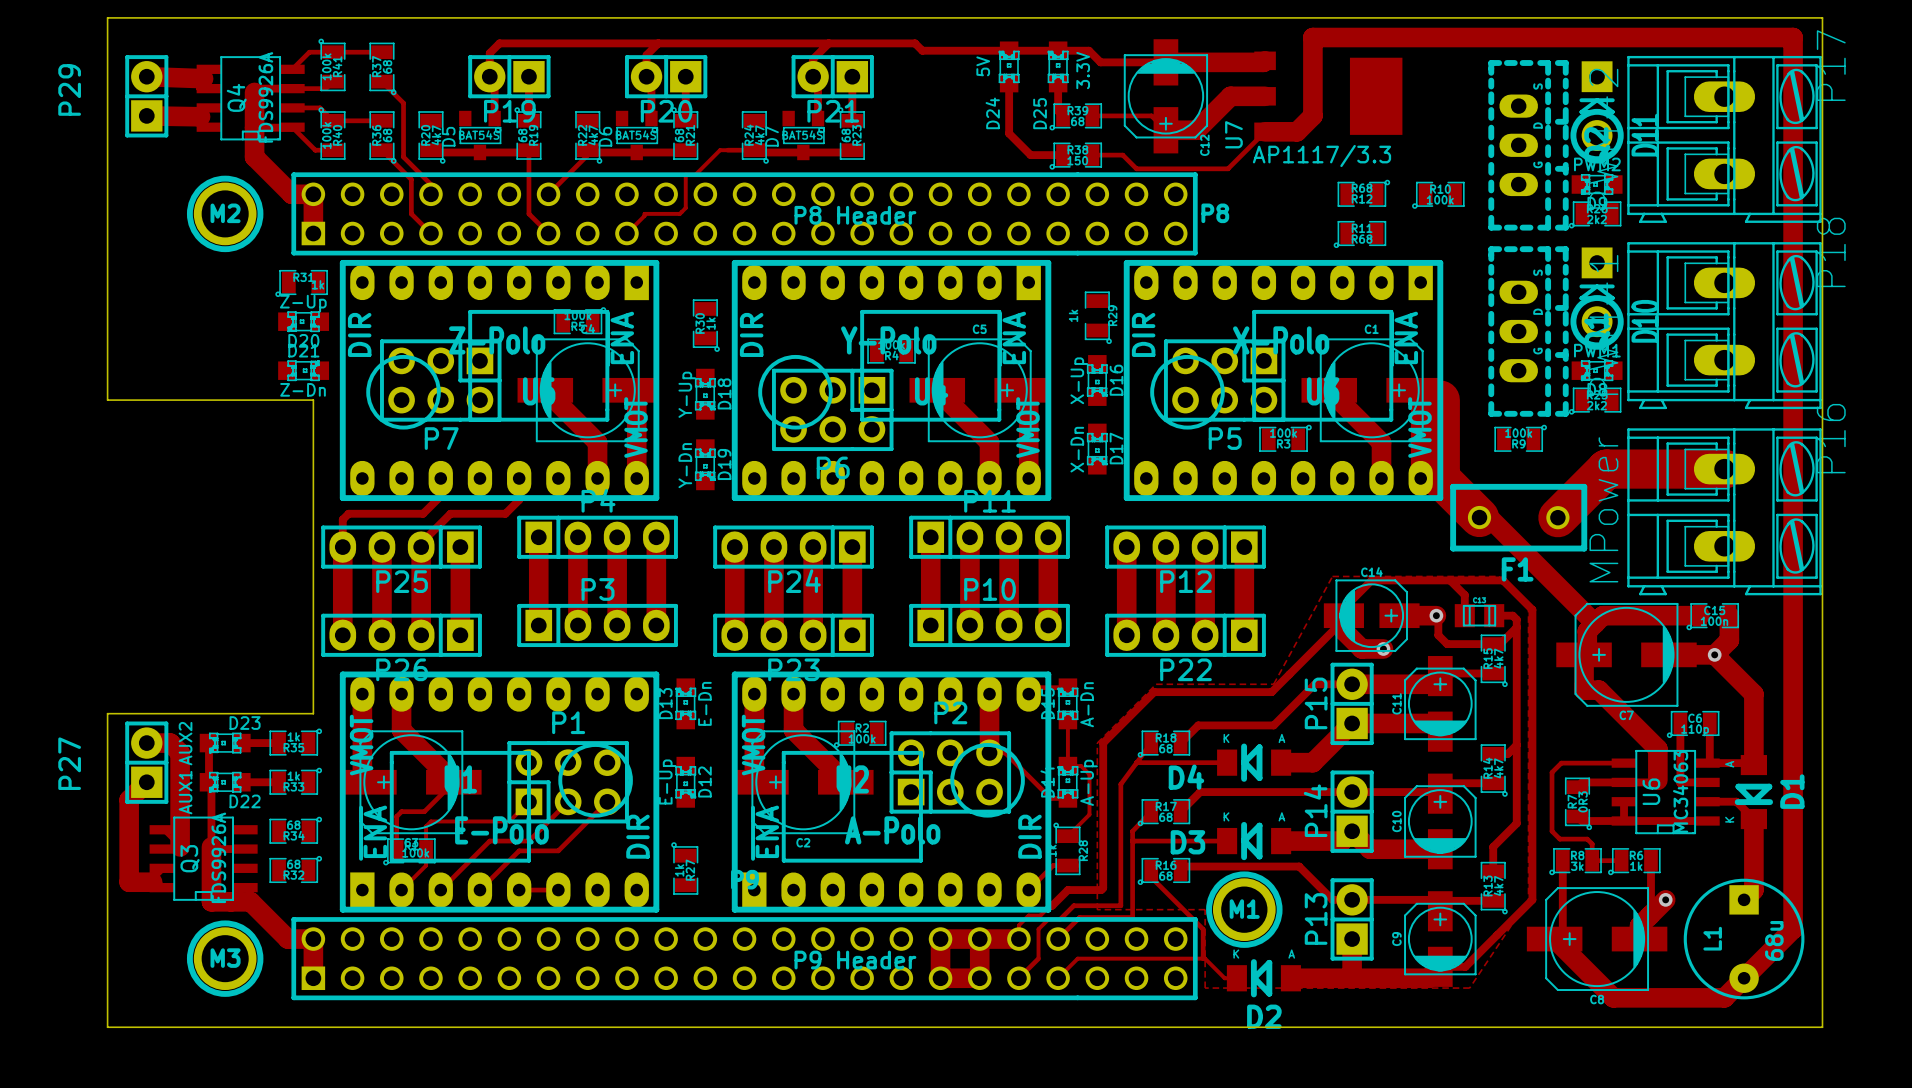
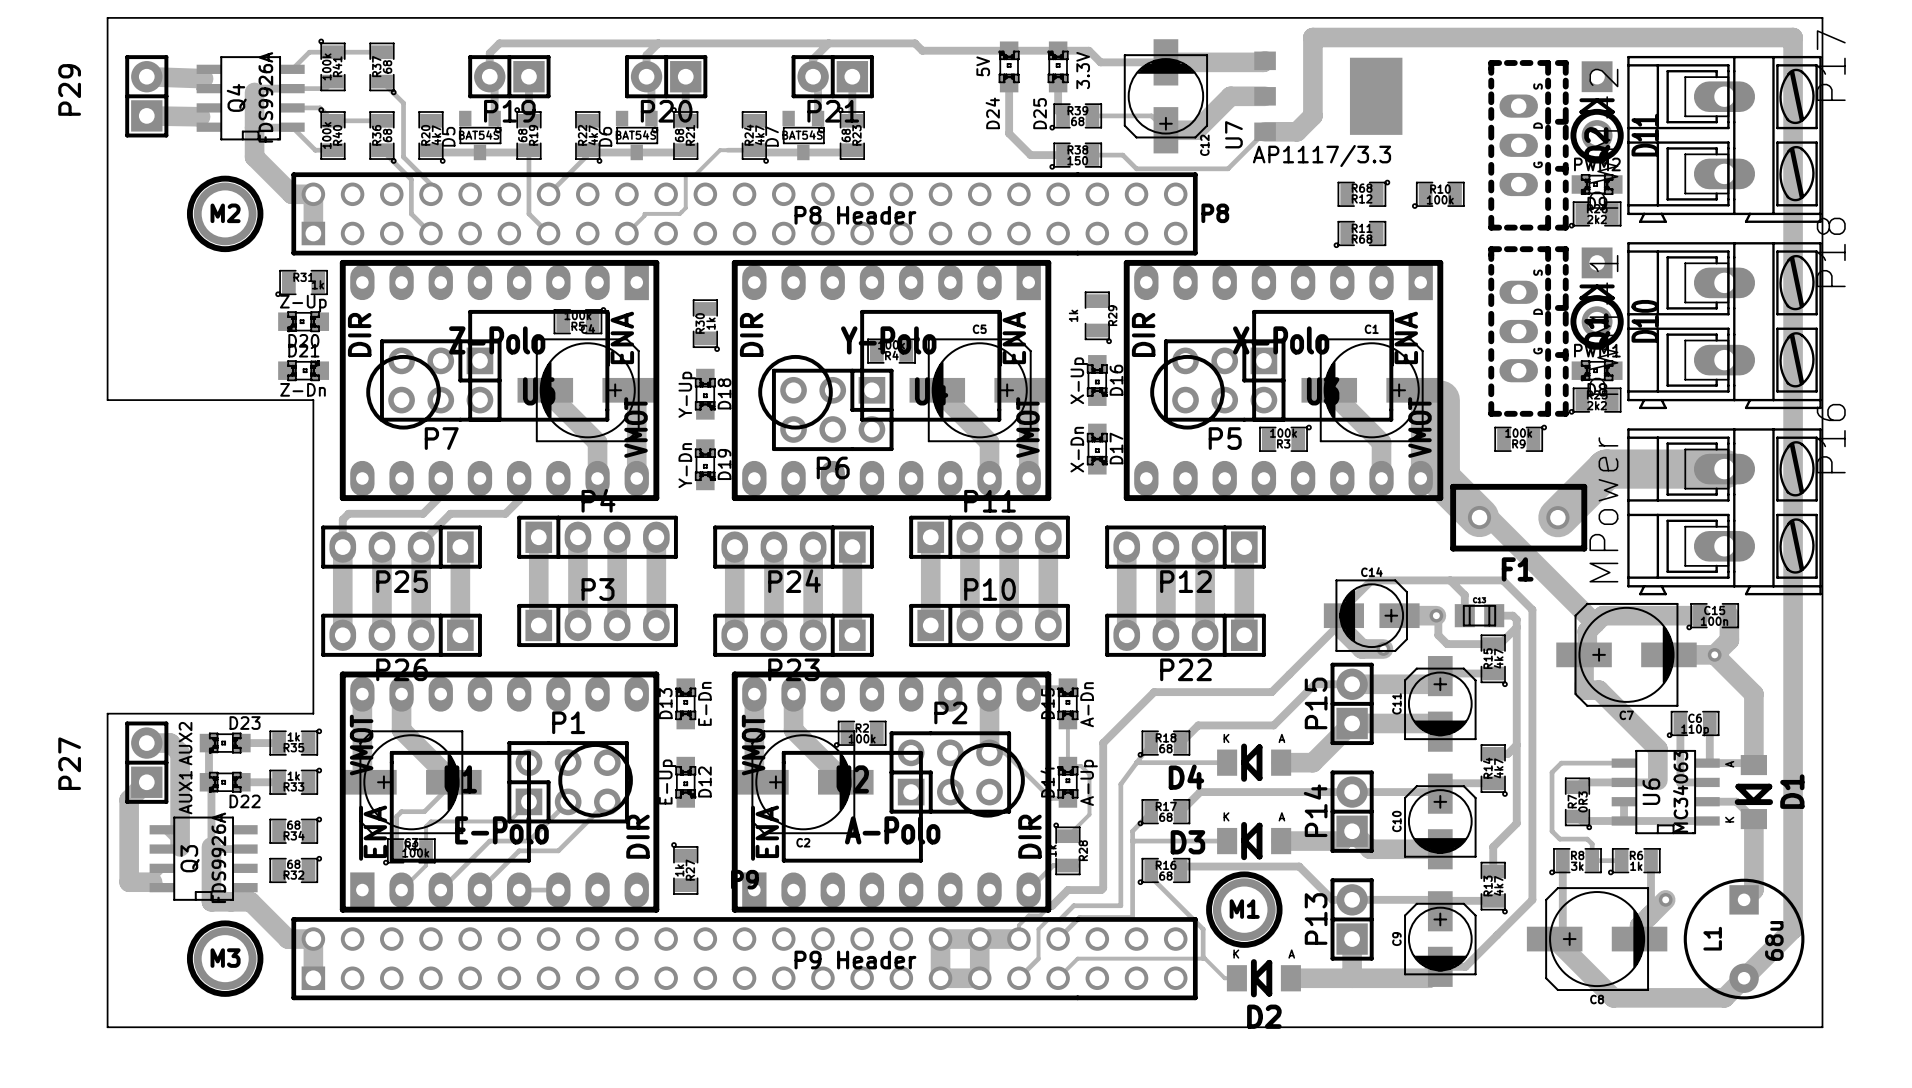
zone outline: (1332, 576) (1273, 684) (1156, 684) (1097, 743) (1097, 909) (1205, 909) (1205, 988) (1469, 988) (1528, 899) (1528, 605) (1499, 576) (1332, 576) -> none

